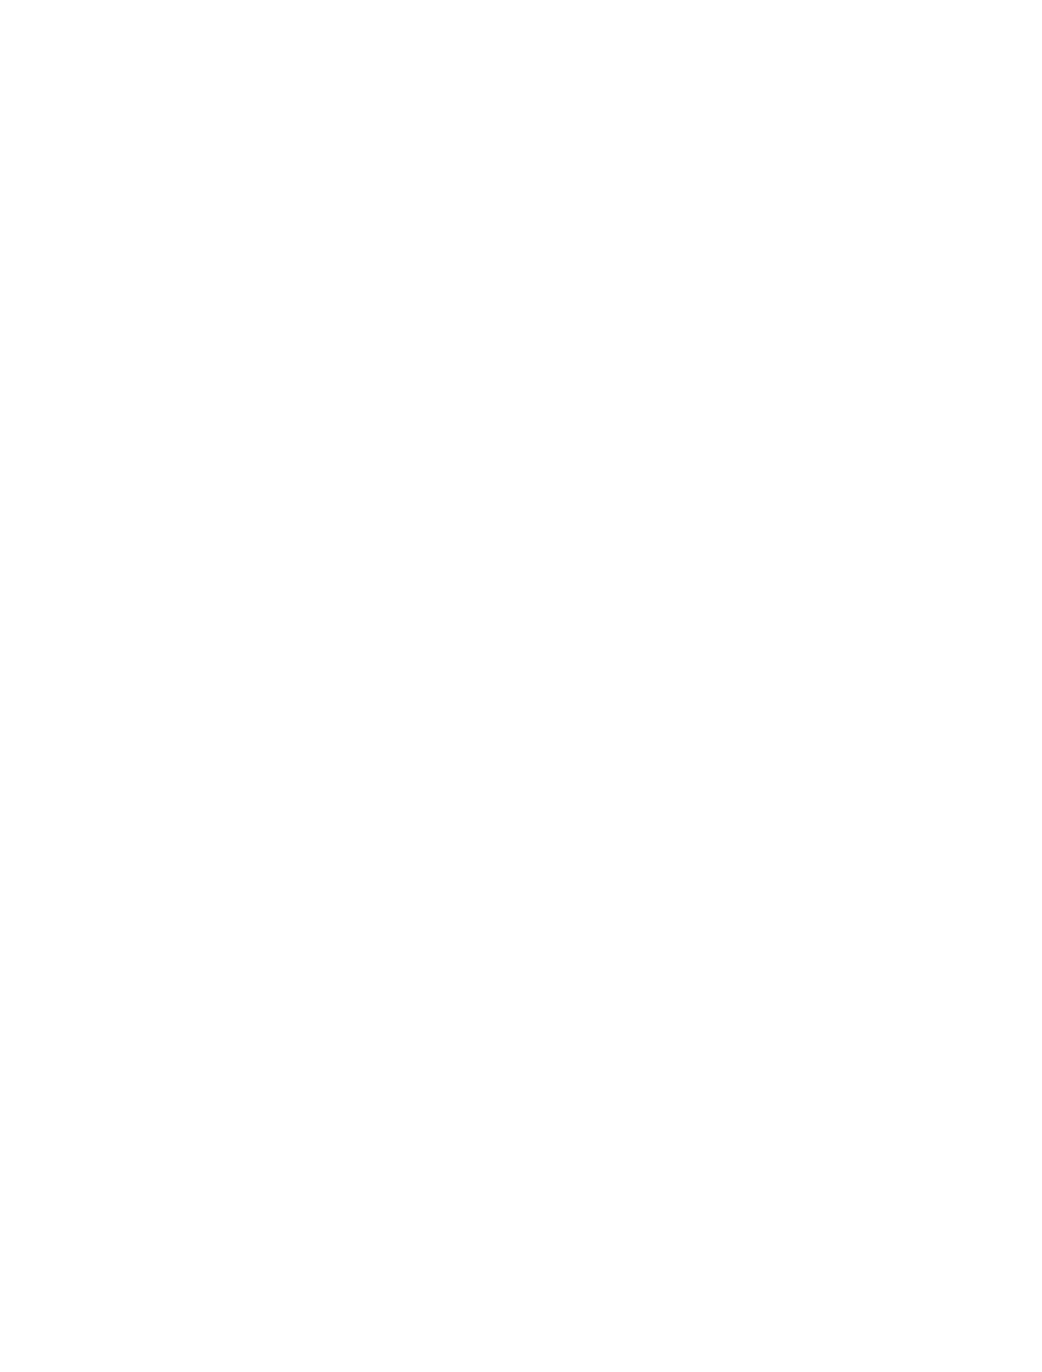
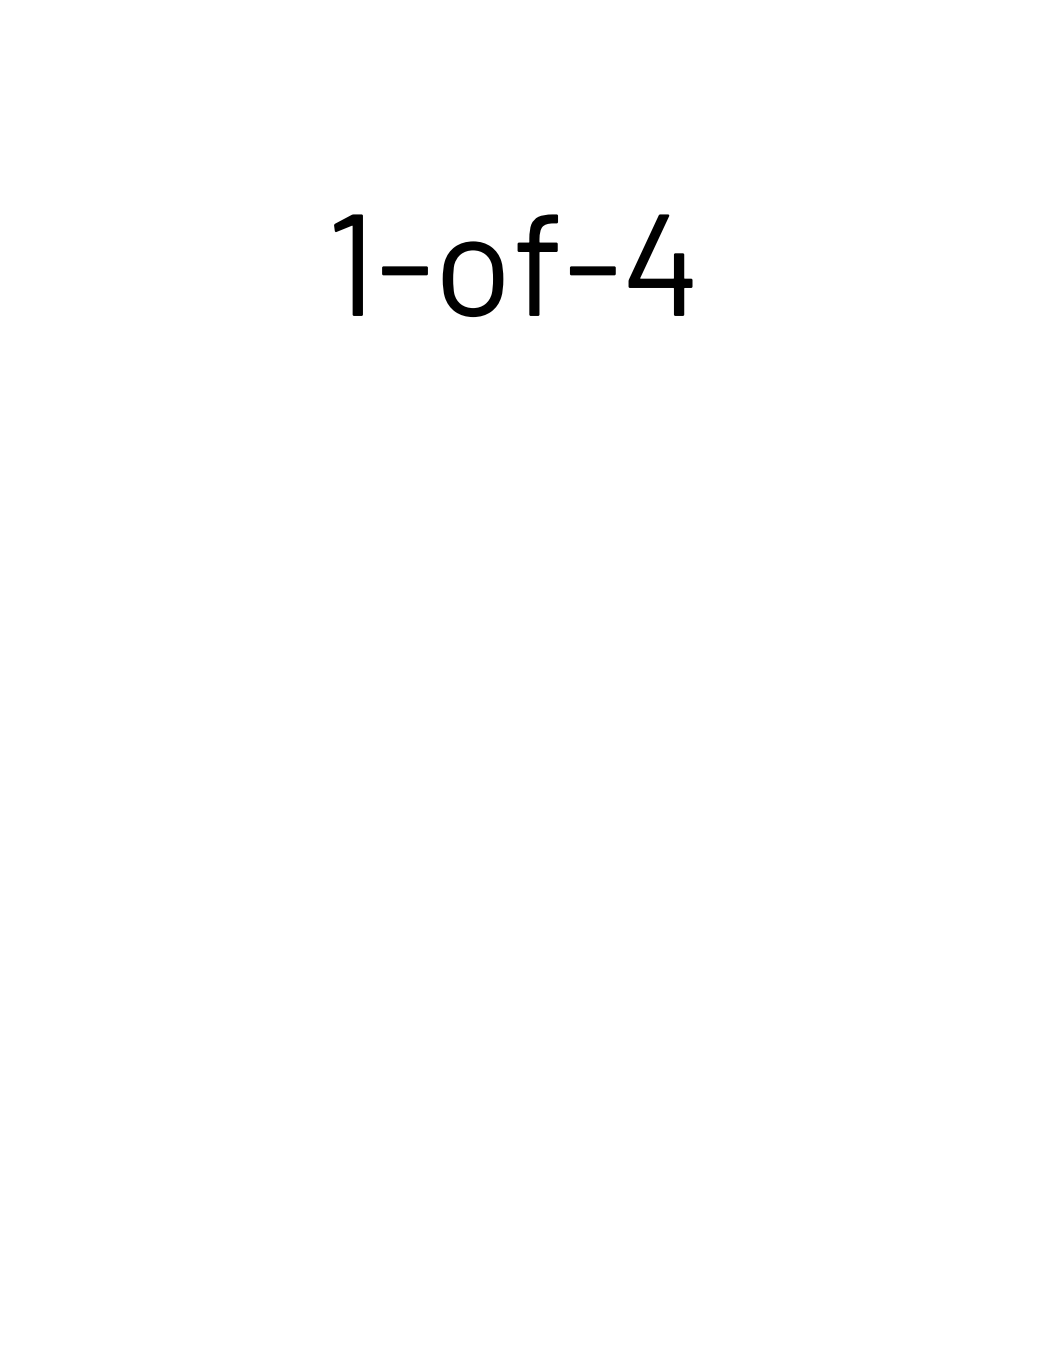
text: none -> 1-of-4 (513, 265)

